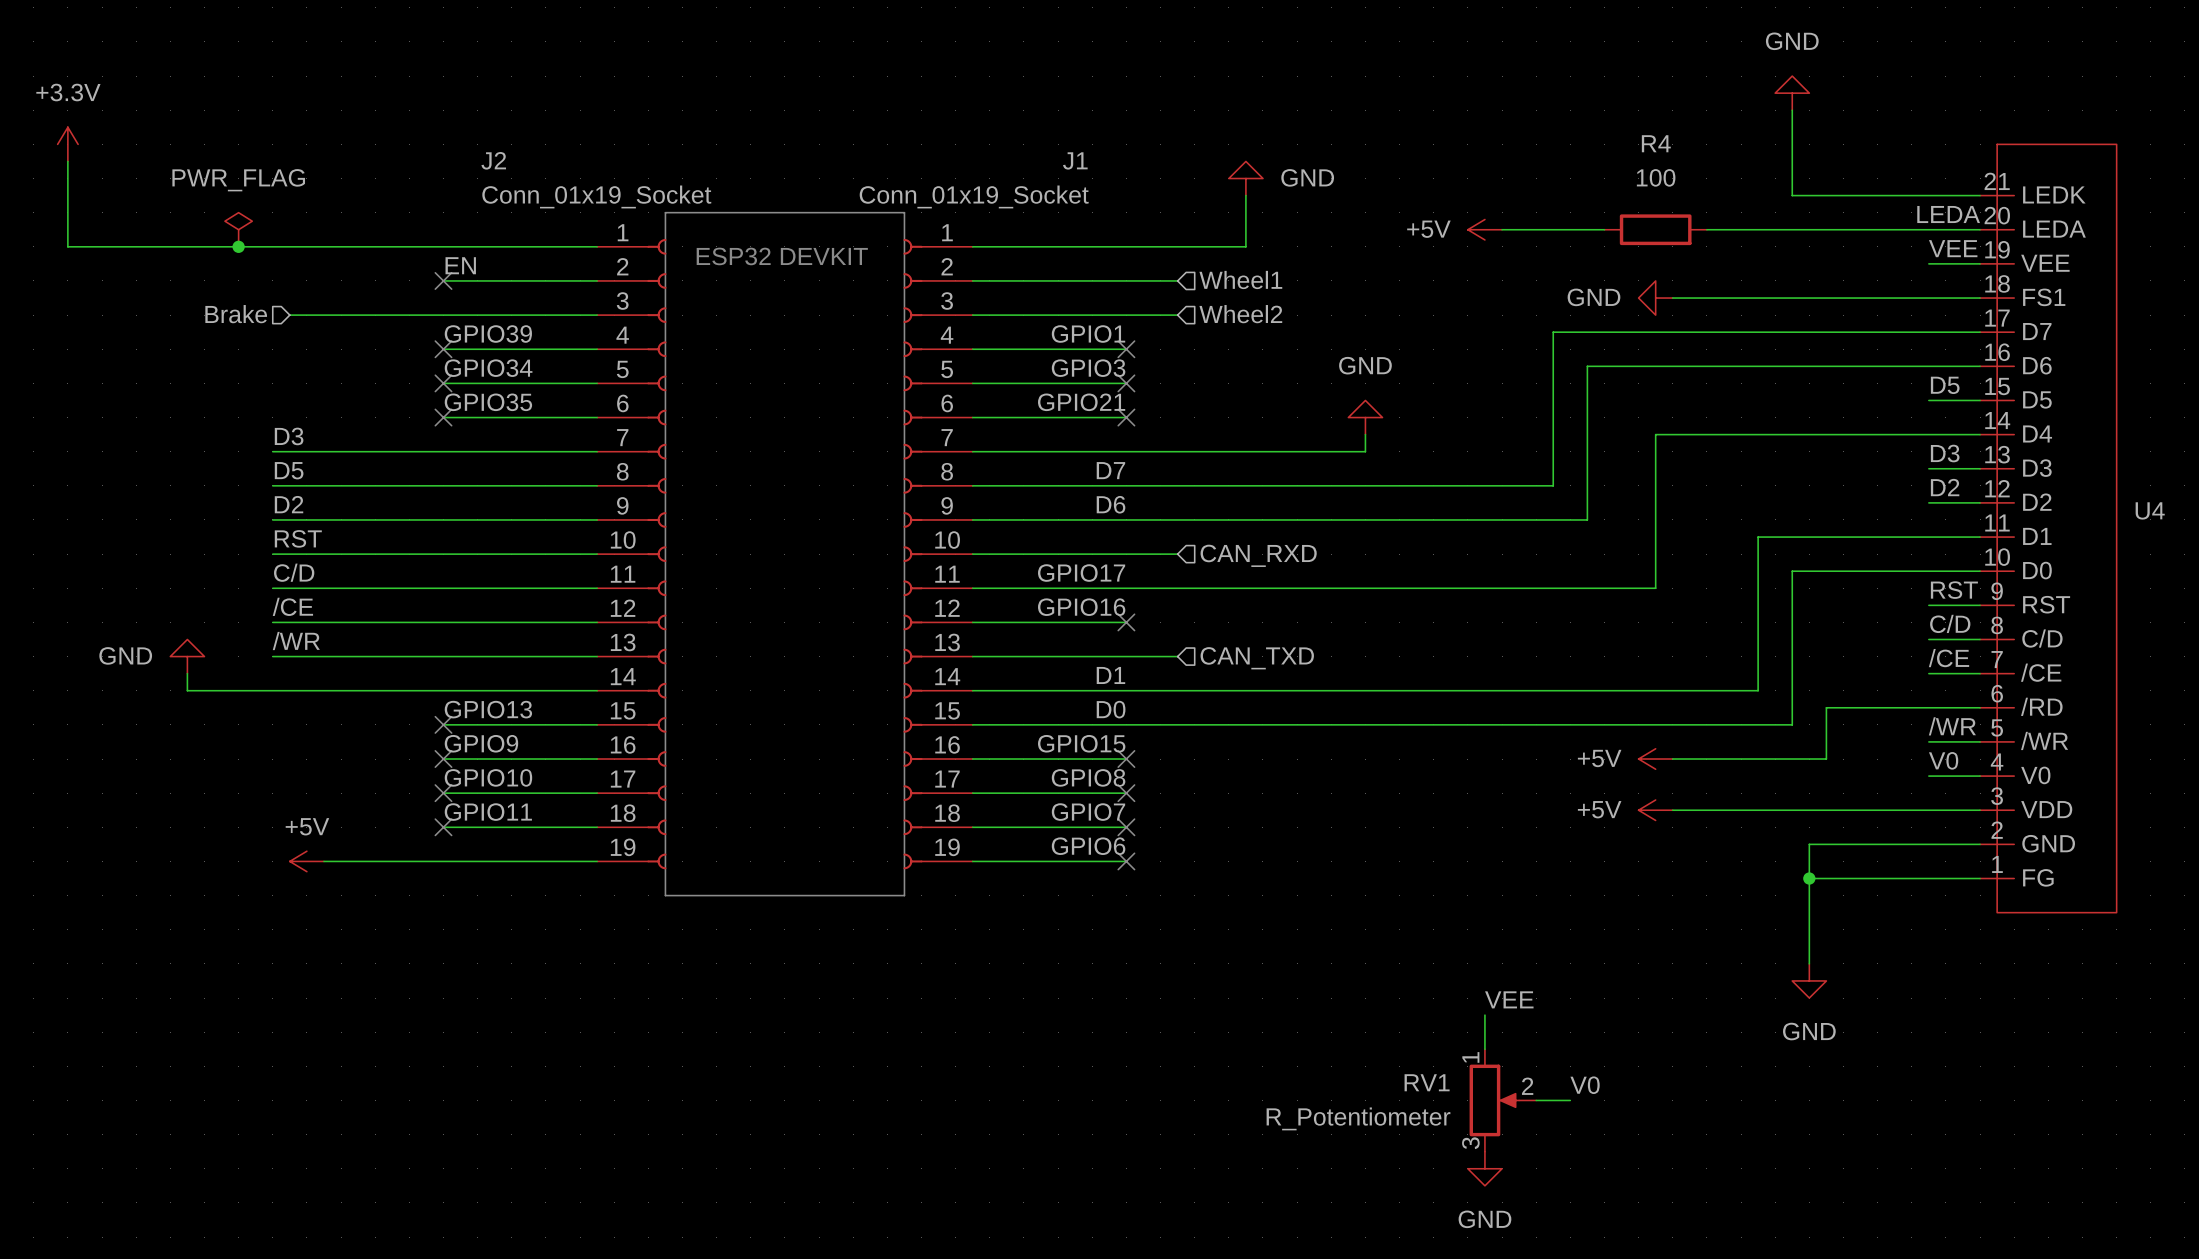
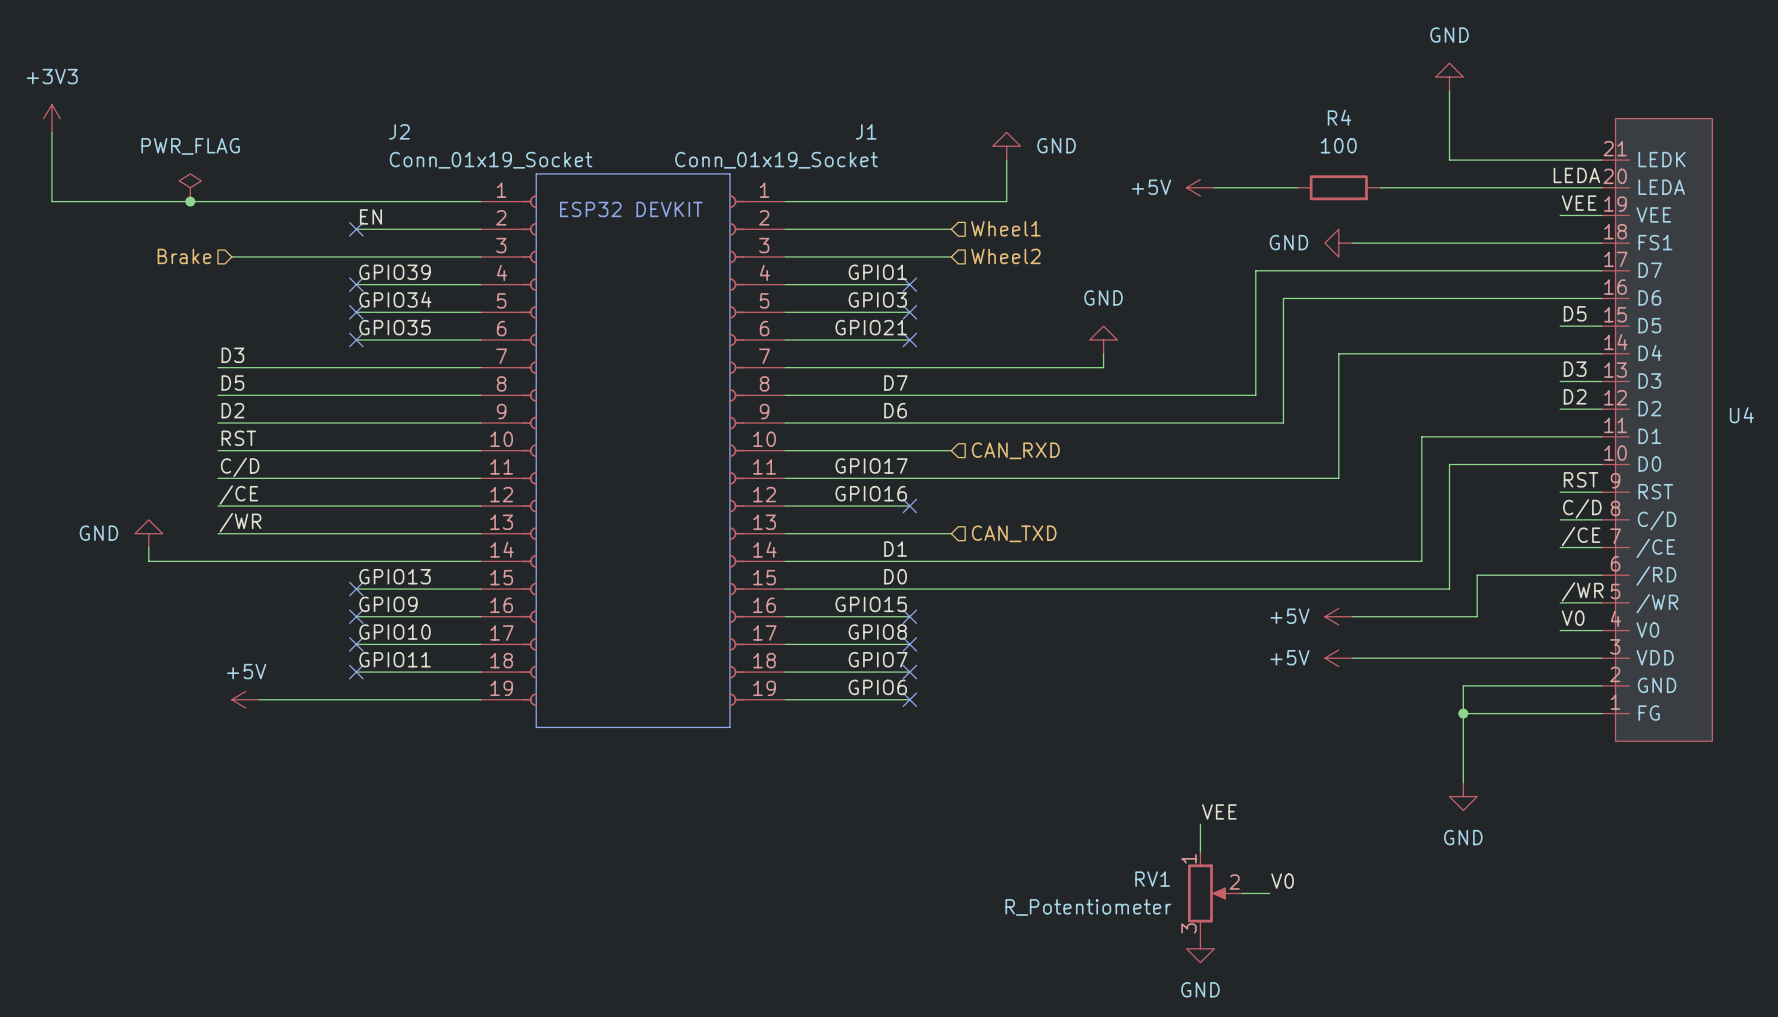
power symbol: +3.3V (67, 144) -> +3V3 (51, 118)

